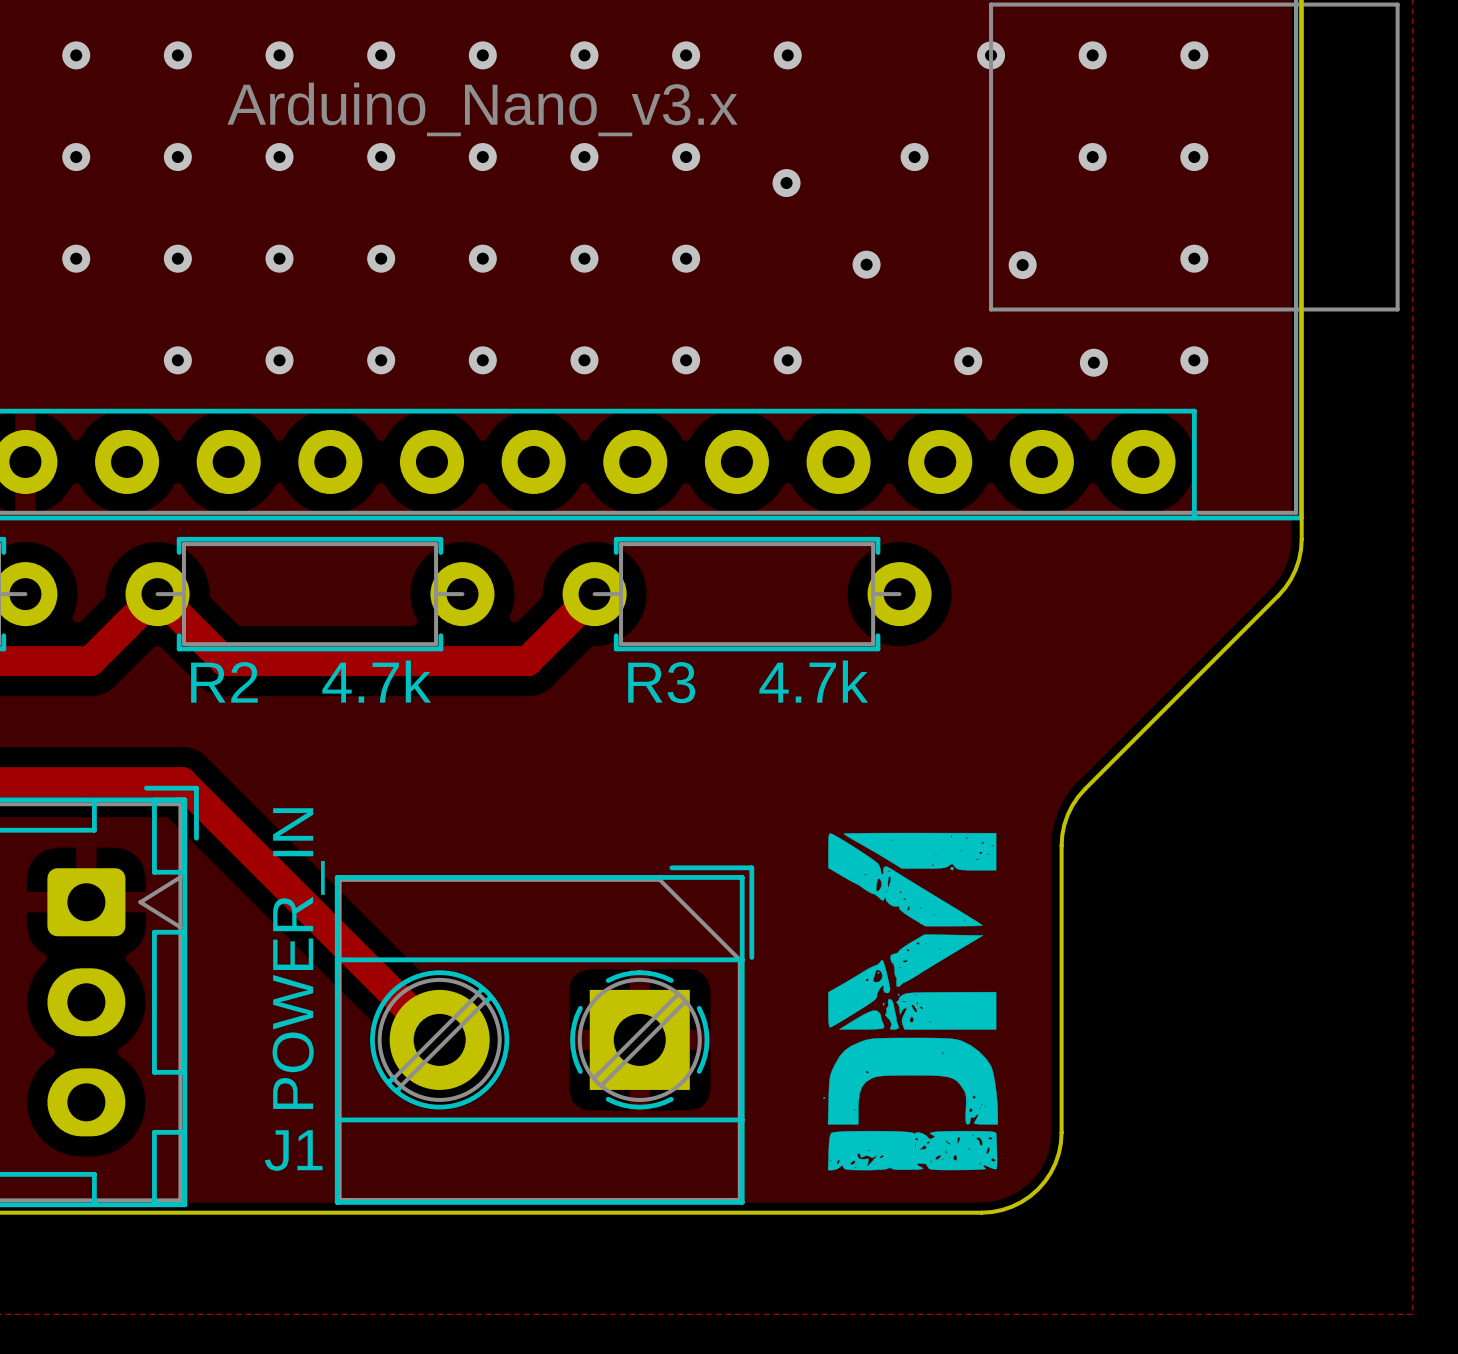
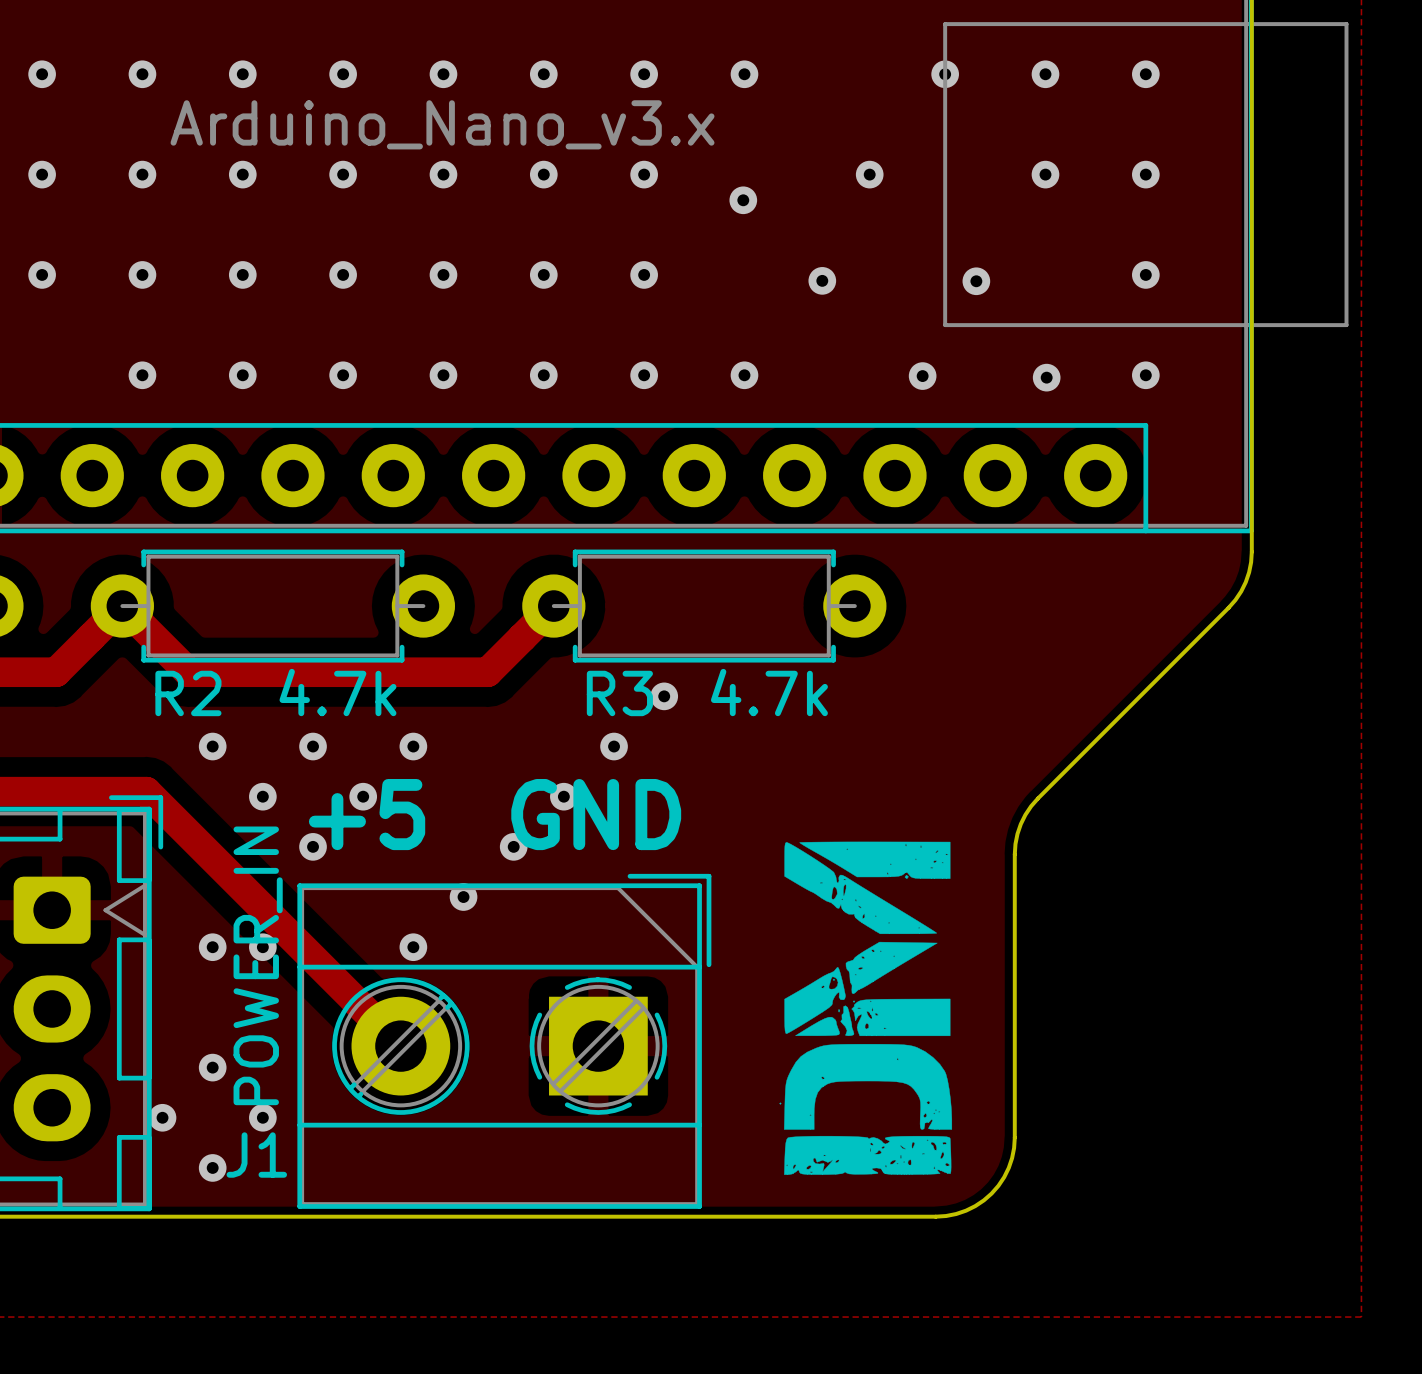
via: none -> (664, 696)
via: none -> (212, 746)
via: none -> (313, 746)
via: none -> (413, 746)
via: none -> (614, 746)
via: none -> (262, 796)
via: none -> (363, 796)
via: none -> (563, 796)
text: none -> +5 (367, 814)
text: none -> GND (596, 814)
via: none -> (313, 846)
via: none -> (513, 846)
via: none -> (463, 897)
via: none -> (212, 947)
via: none -> (262, 947)
via: none -> (413, 947)
via: none -> (212, 1067)
via: none -> (162, 1117)
via: none -> (262, 1117)
via: none -> (212, 1167)

